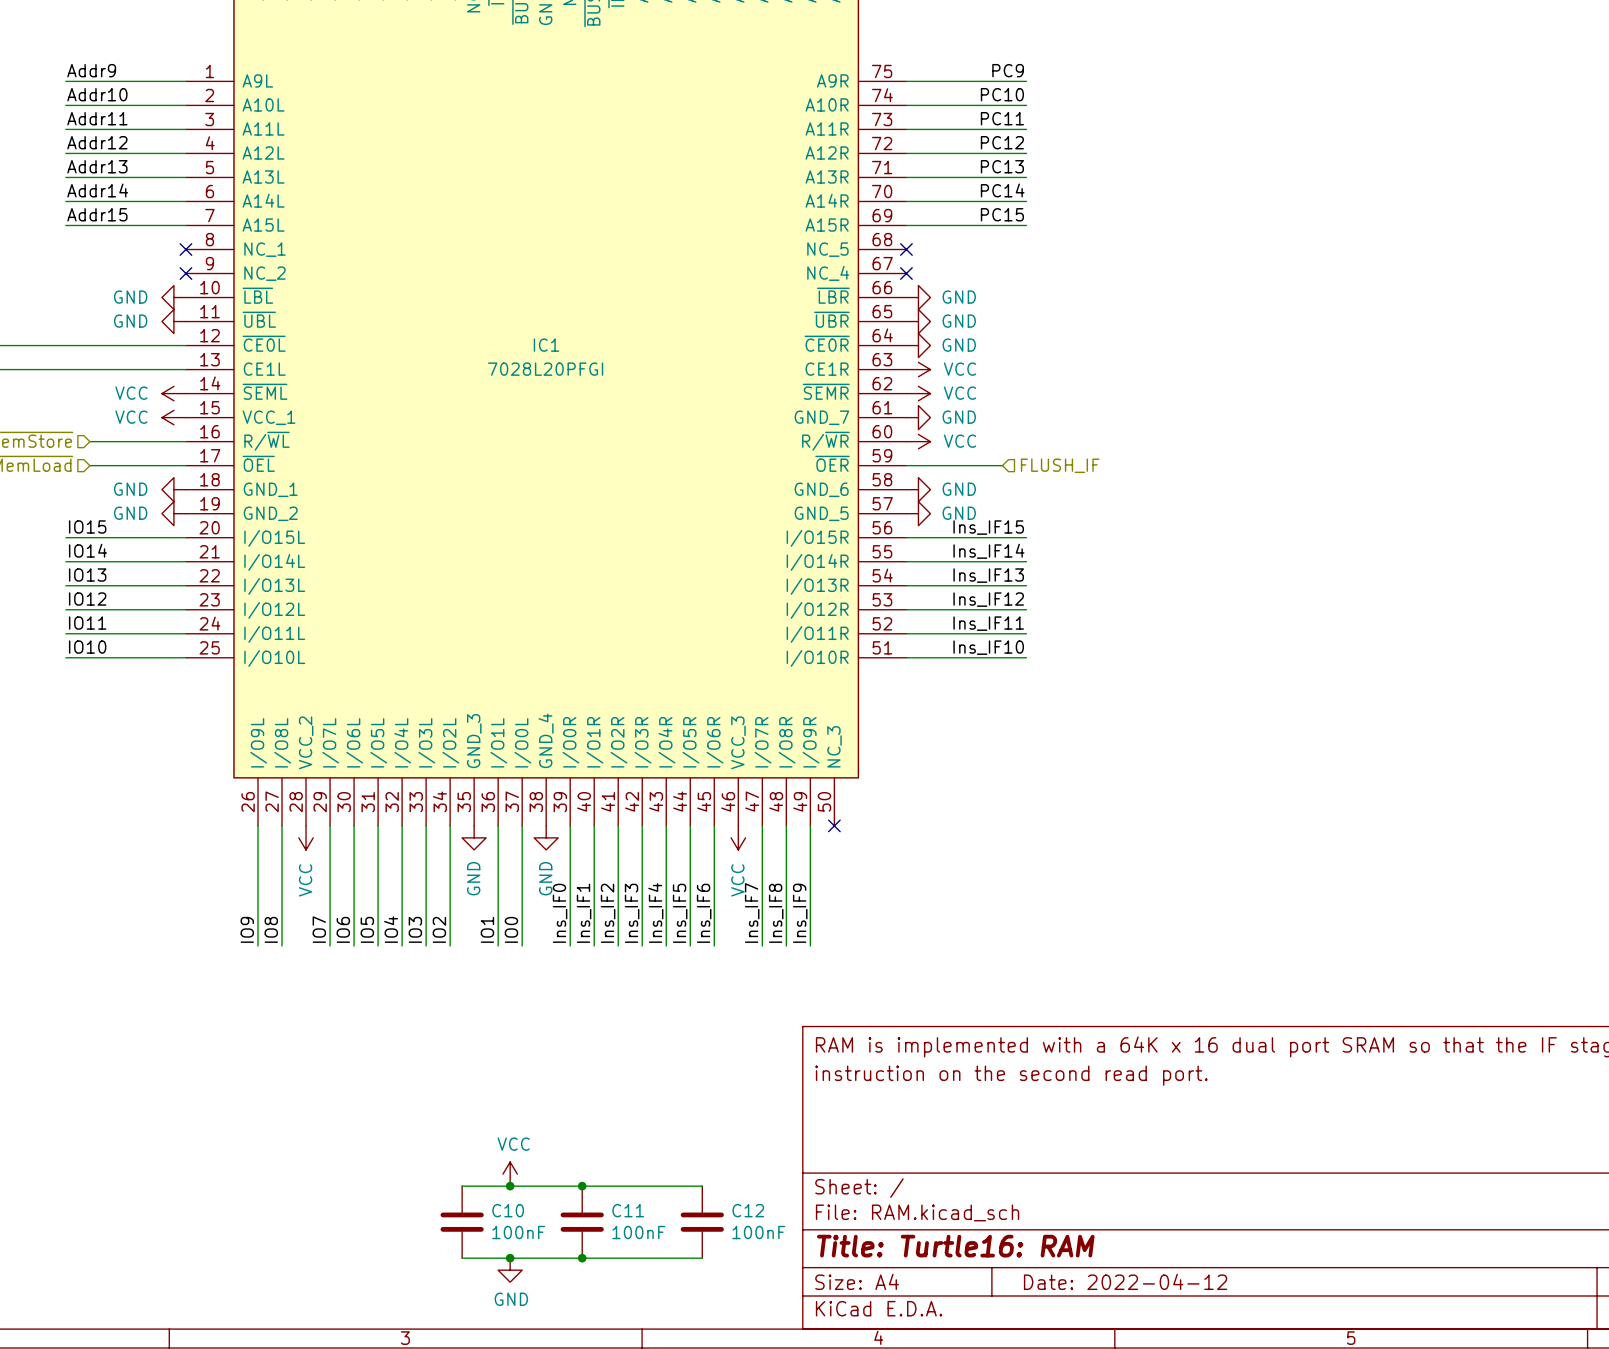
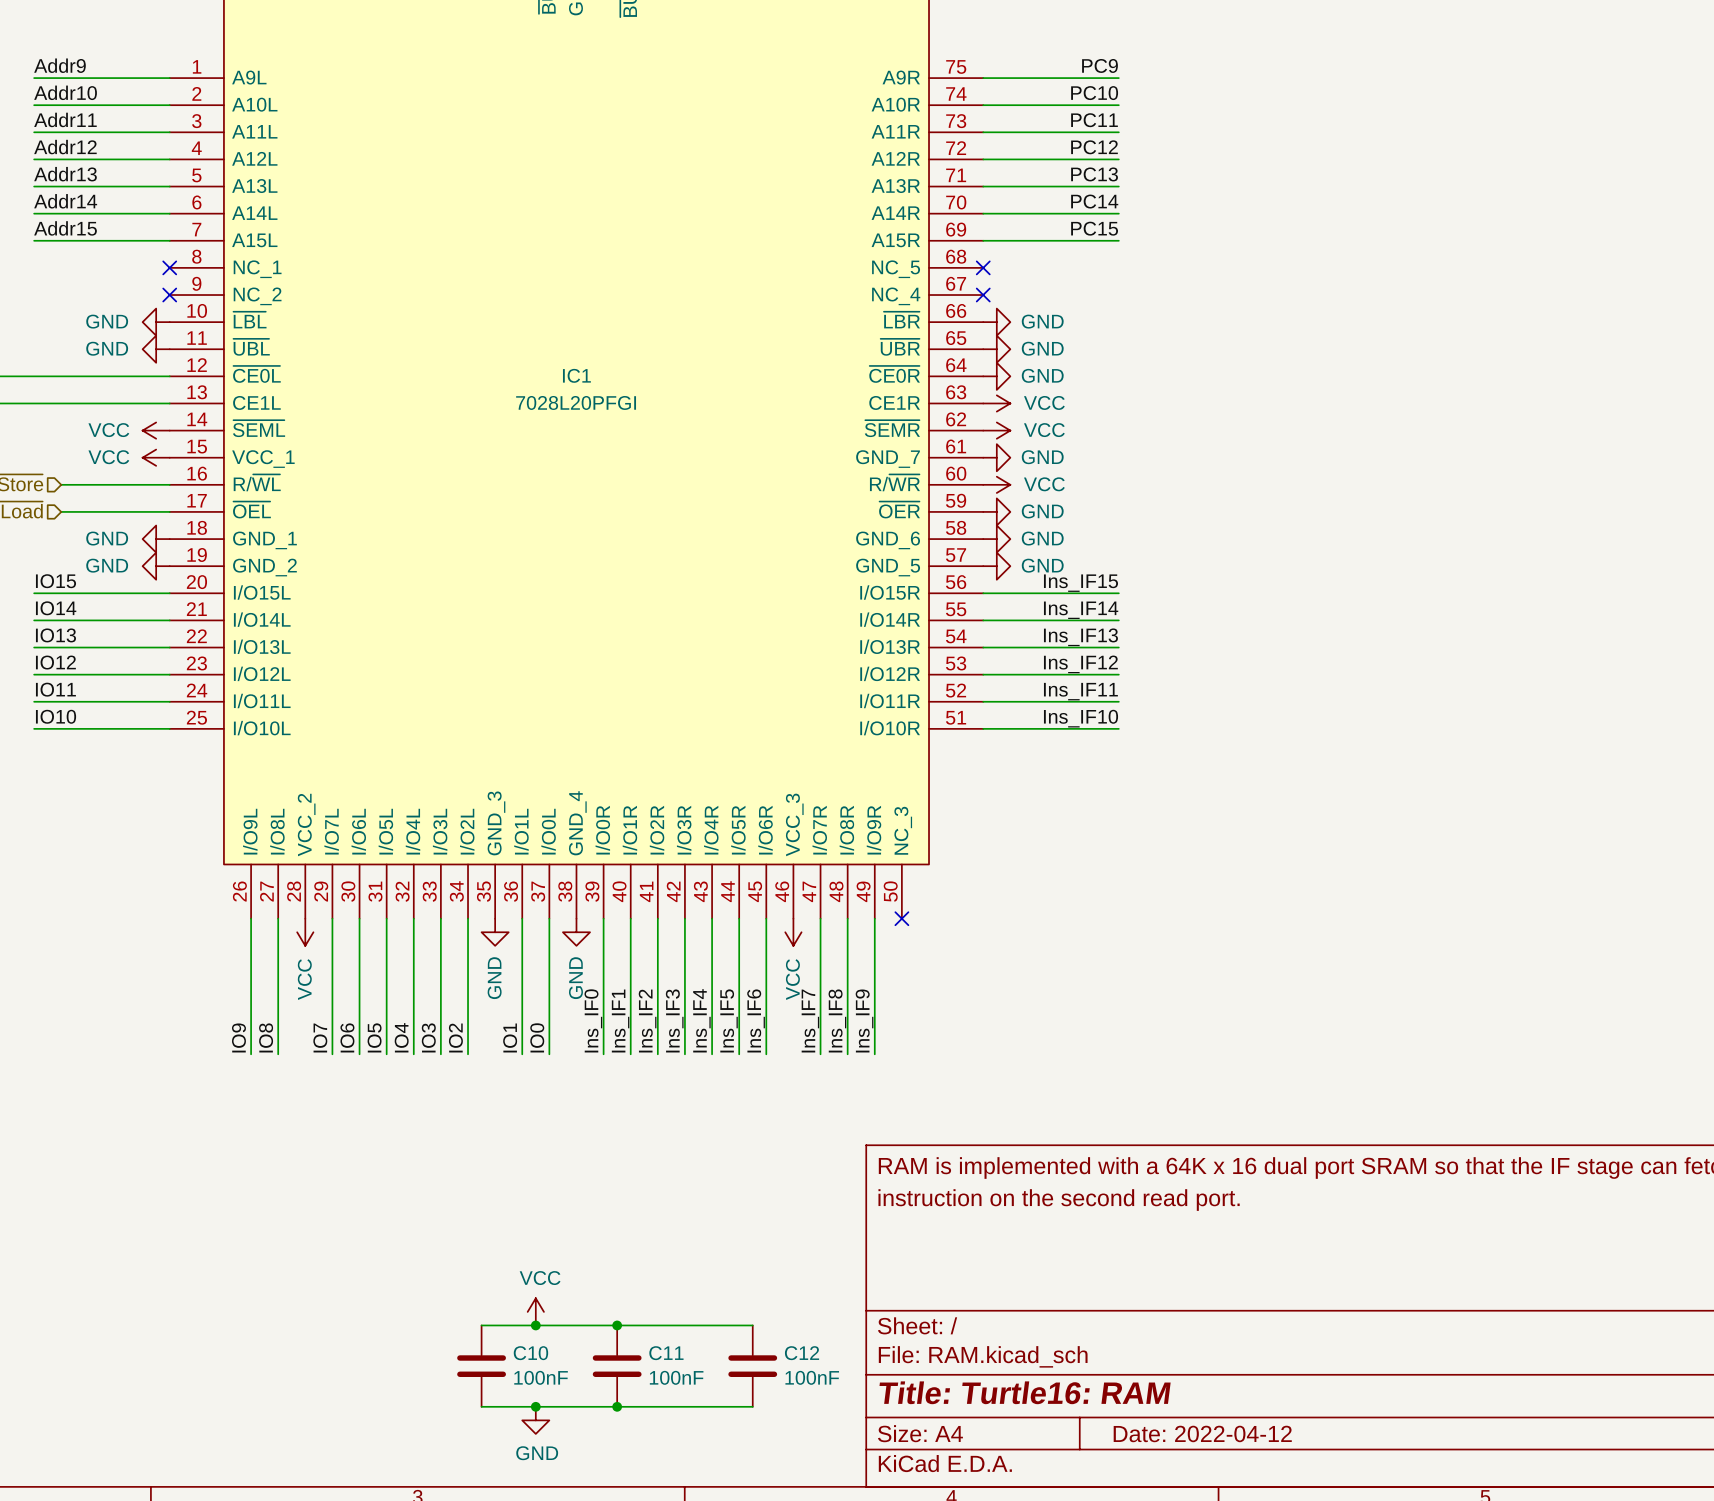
wire: (906, 465) (1002, 465) -> none
power symbol: none -> GND (996, 511)
hierarchical label: FLUSH_IF (1060, 465) -> none

